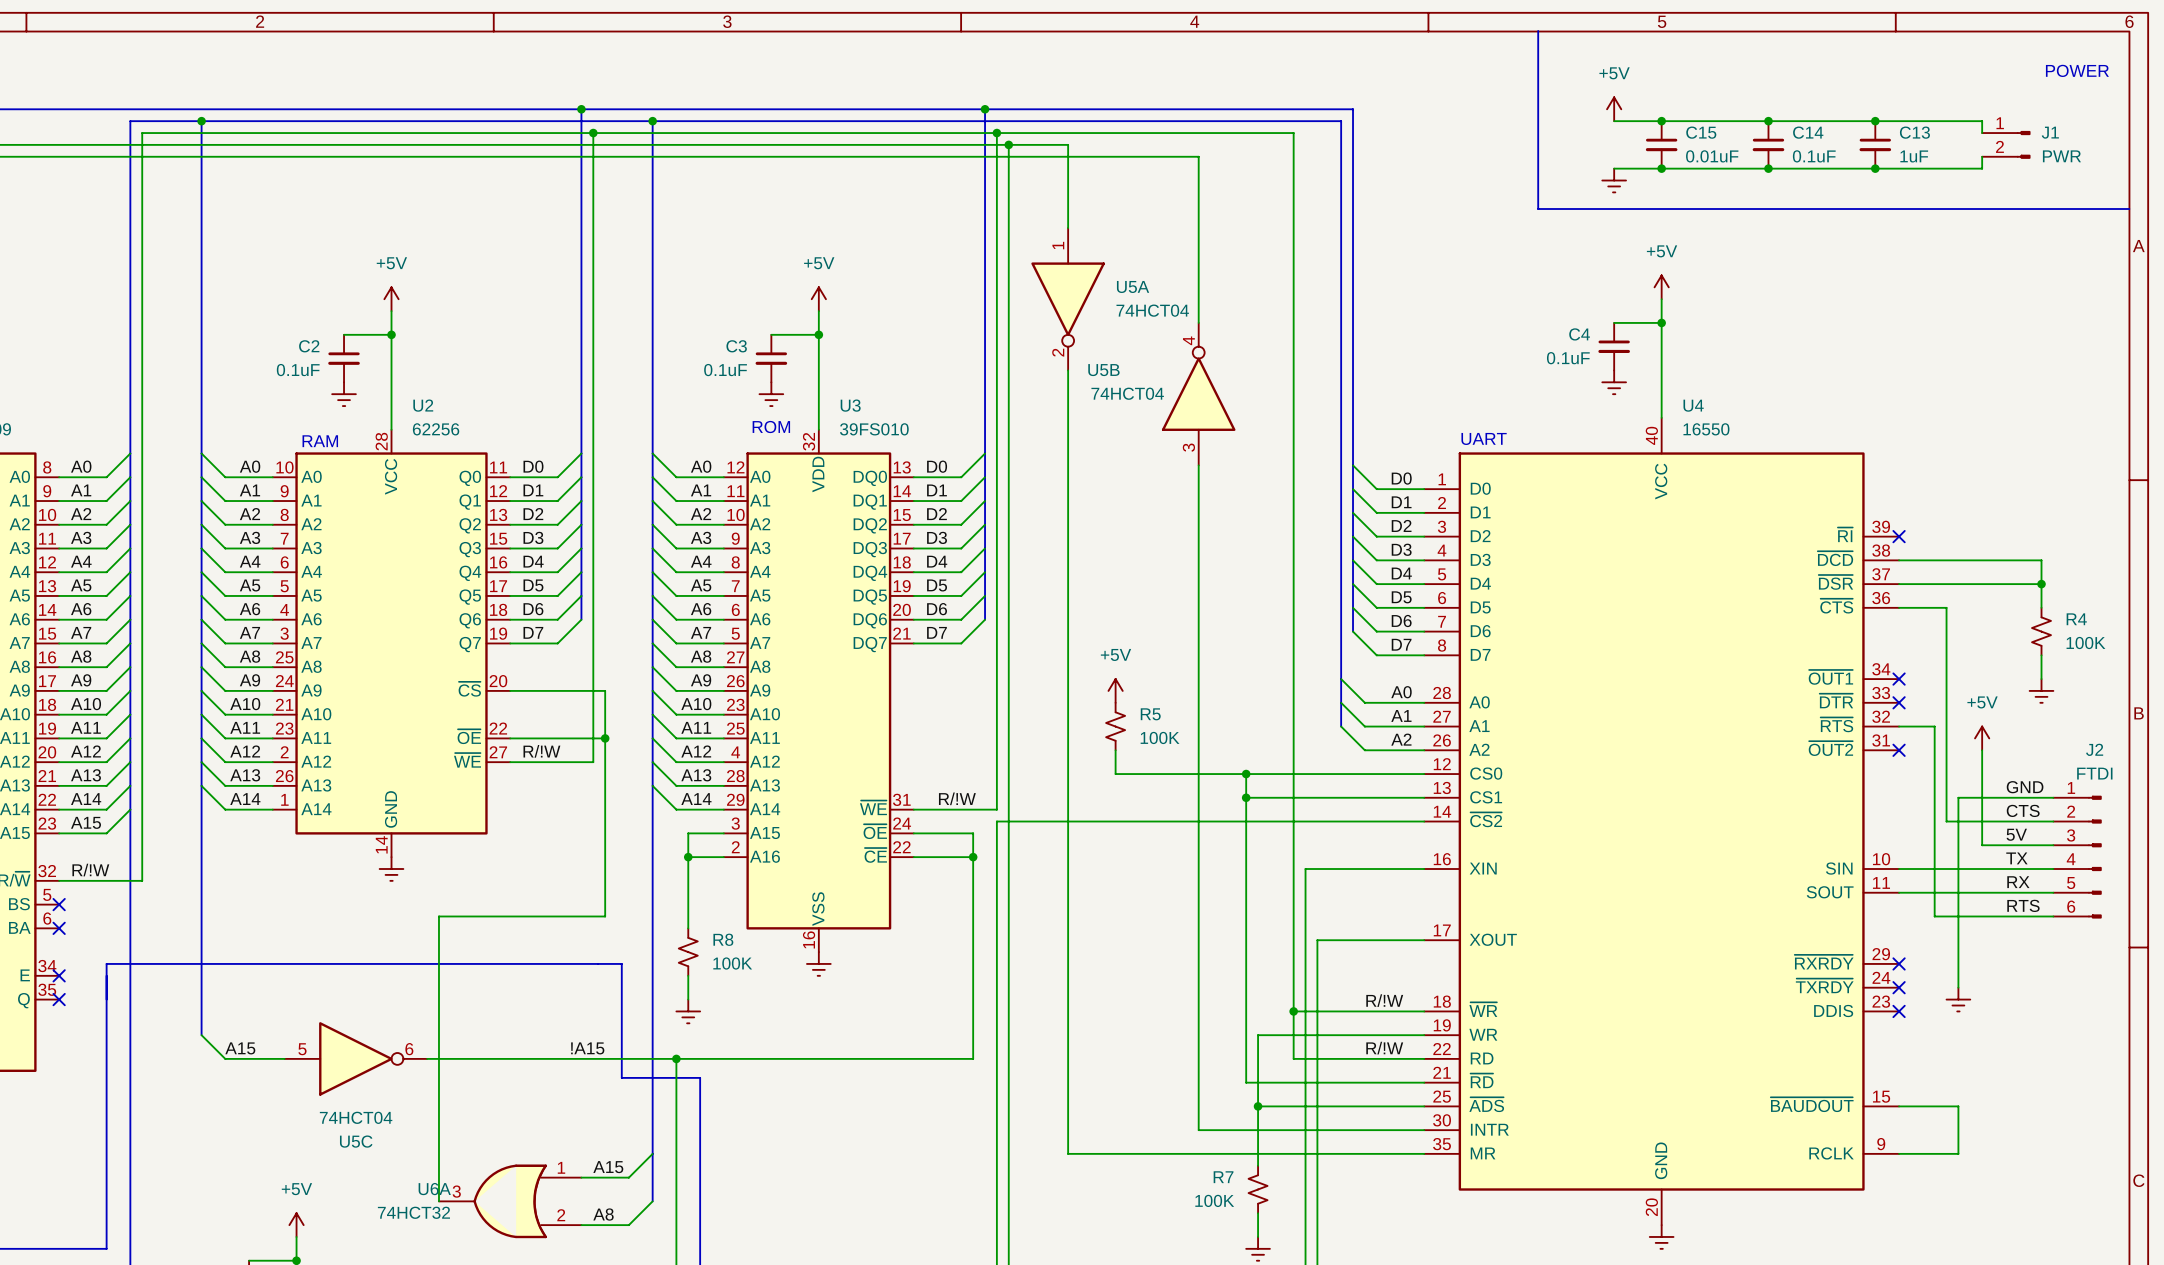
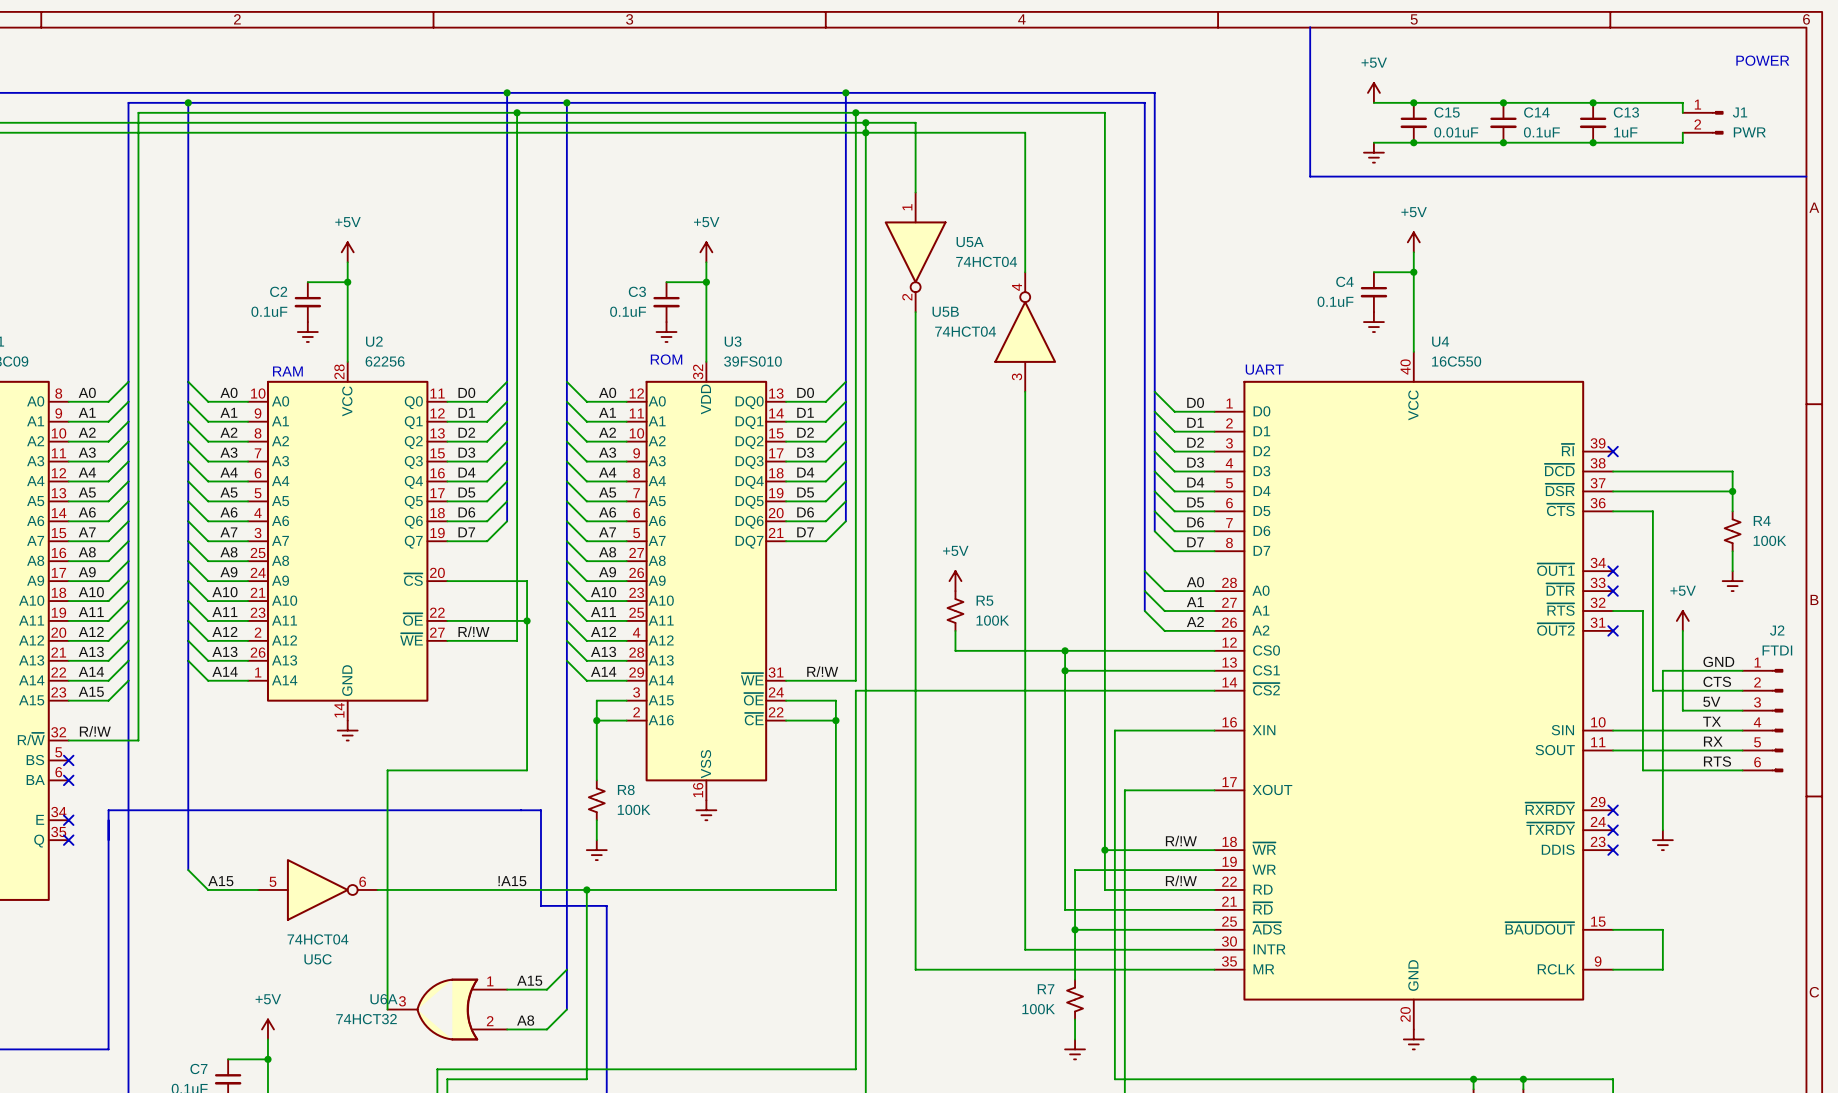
junction: none -> (865, 132)
U4 value: 16550 (1706, 429) -> 16C550 (1456, 361)

